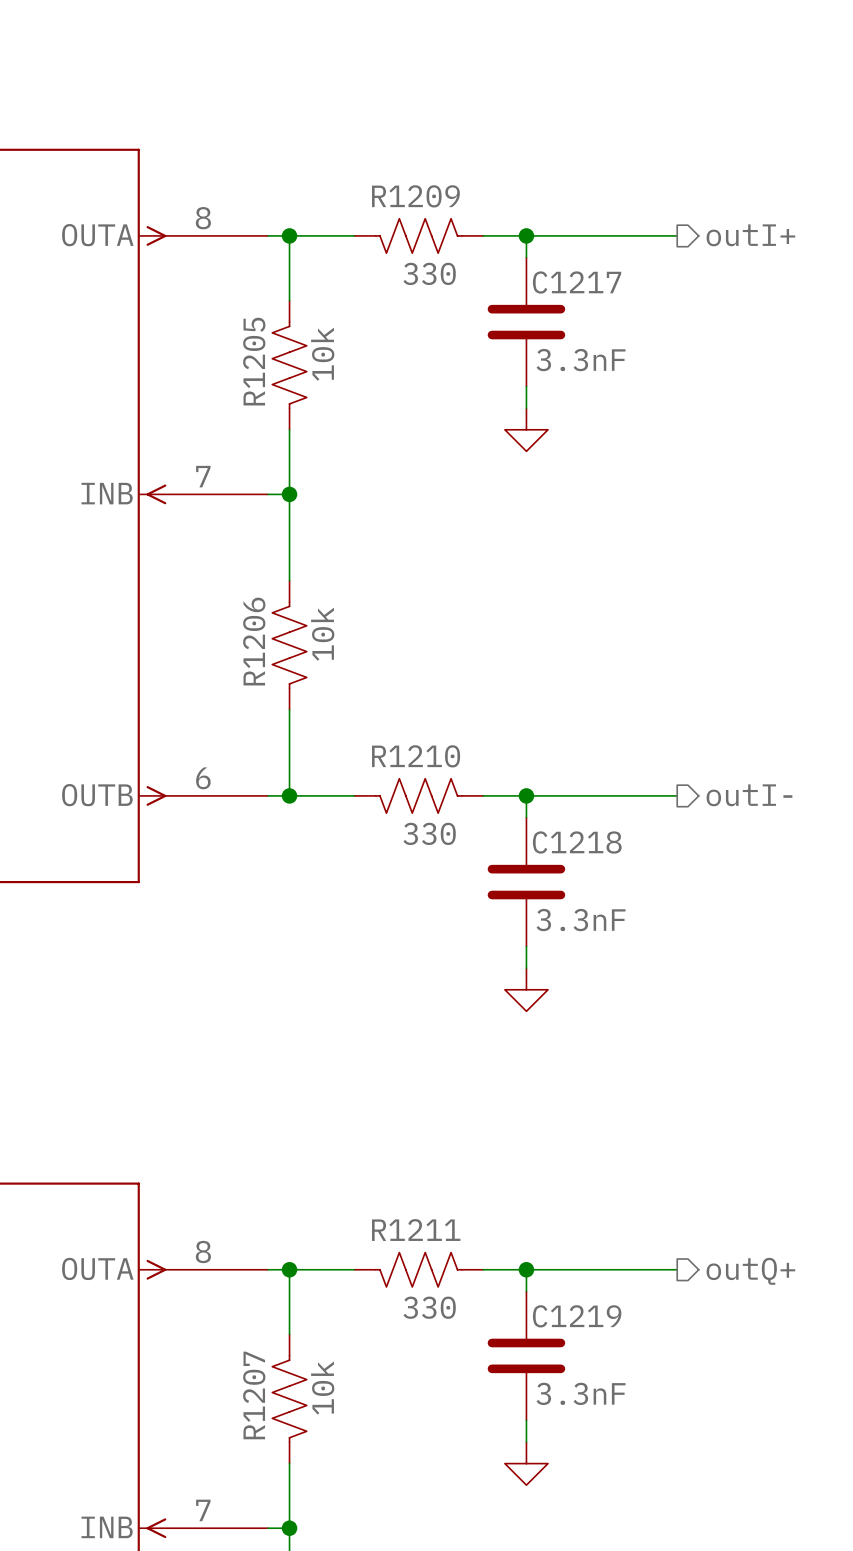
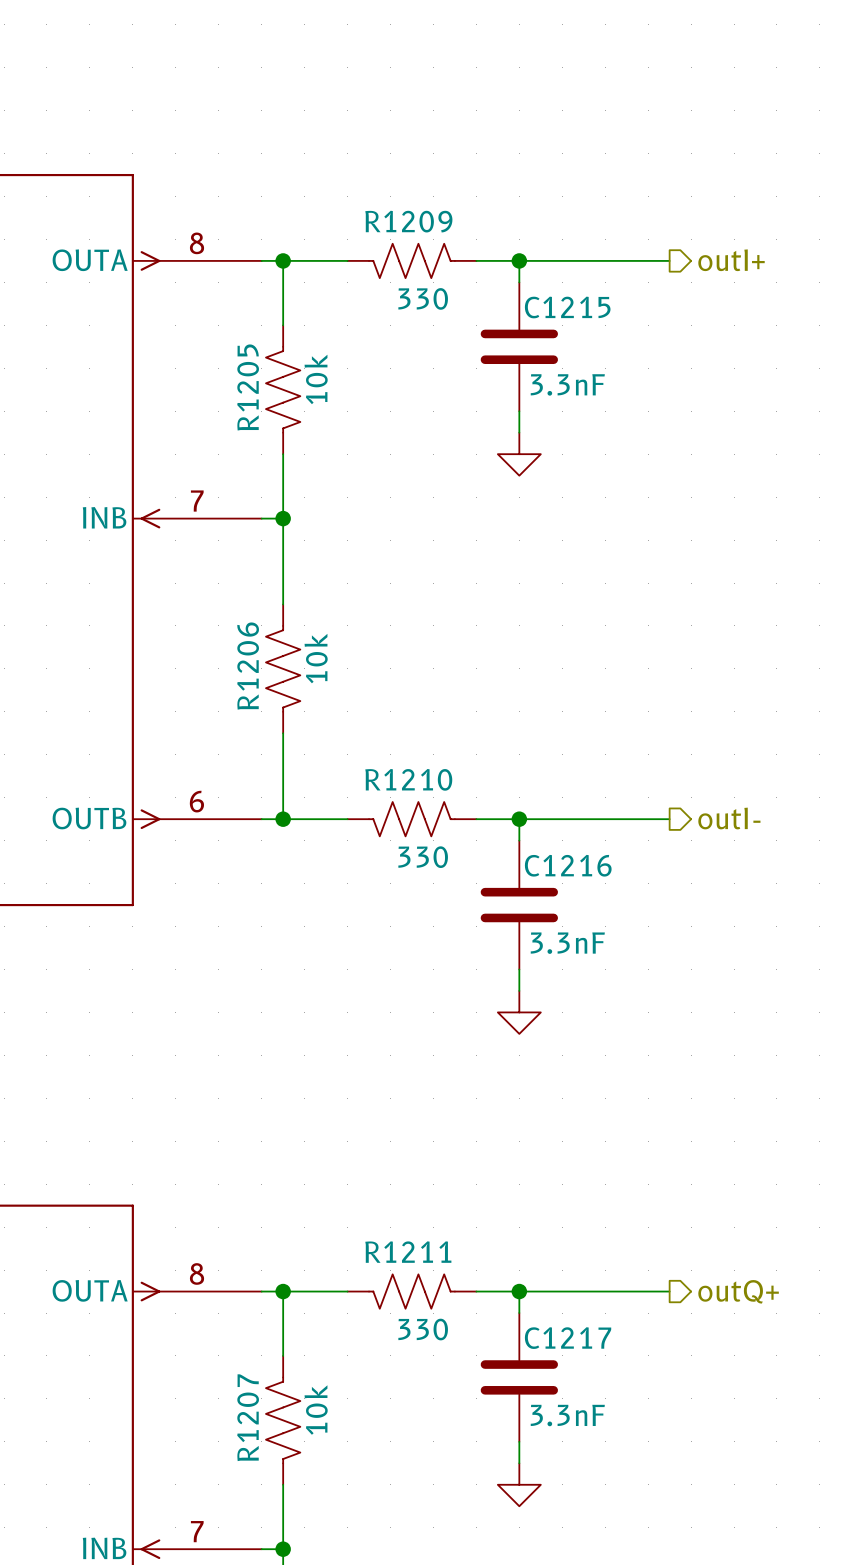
C1217 name: C1217 (577, 282) -> C1215 (567, 307)
C1218 name: C1218 (577, 842) -> C1216 (568, 865)
C1219 name: C1219 (577, 1316) -> C1217 (568, 1338)

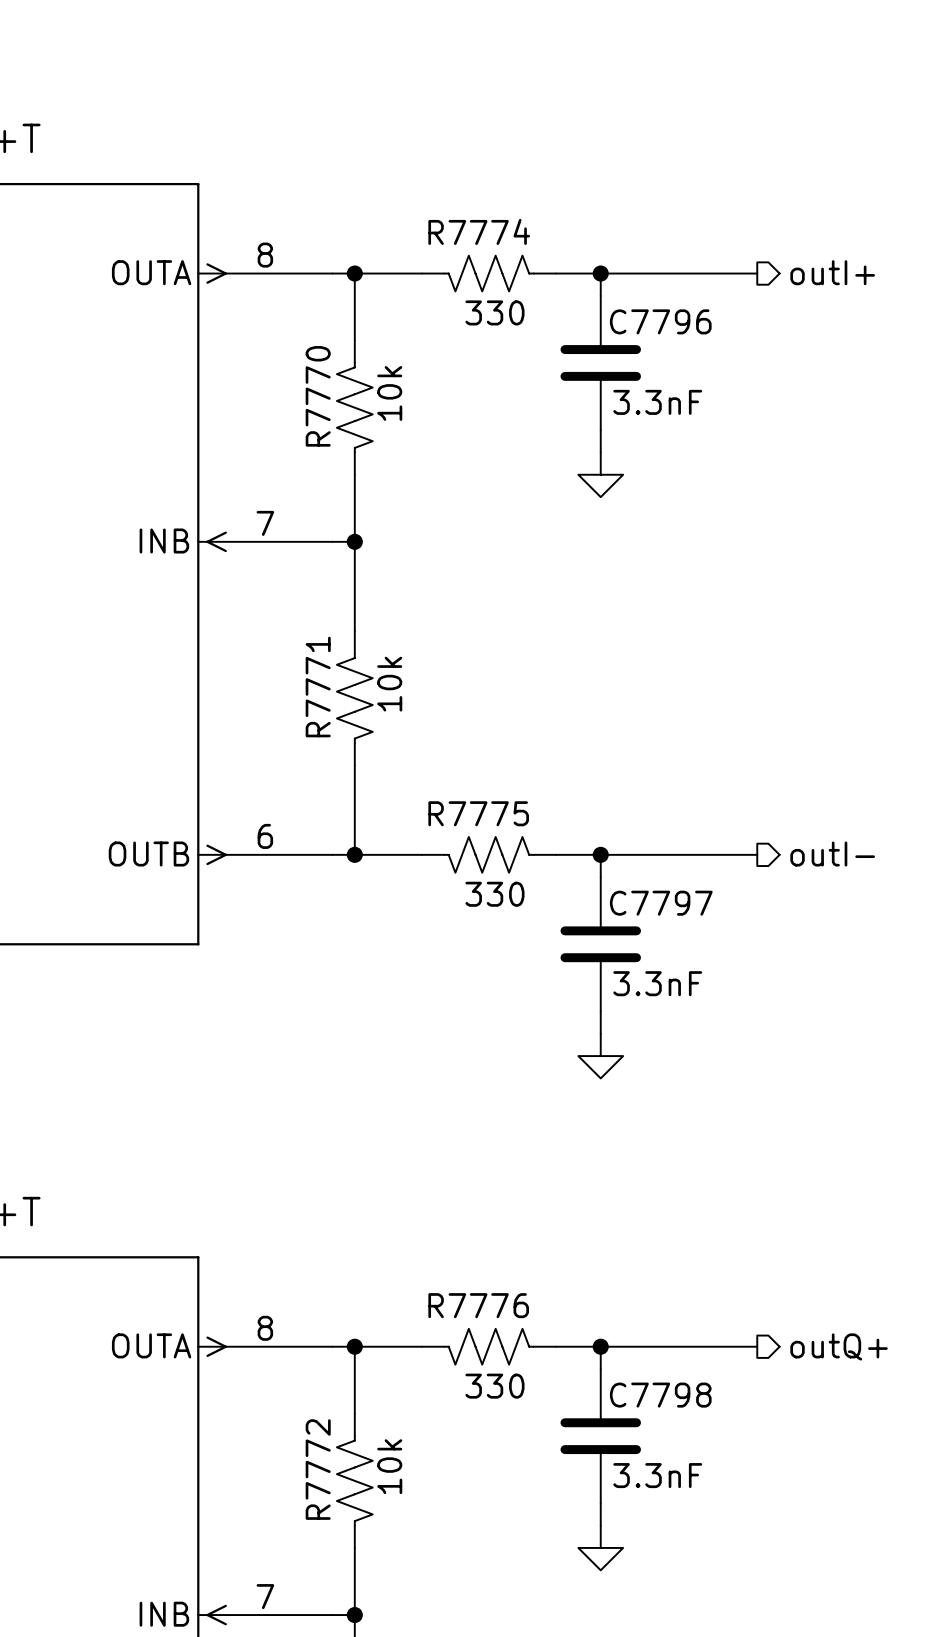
R1209 name: R1209 (408, 221) -> R7774 (479, 231)
C1215 name: C1215 (567, 307) -> C7796 (660, 321)
R1205 name: R1205 (248, 387) -> R7770 (318, 396)
R1206 name: R1206 (248, 666) -> R7771 (318, 686)
R1210 name: R1210 (408, 779) -> R7775 (478, 813)
C1216 name: C1216 (568, 865) -> C7797 (661, 903)
R1211 name: R1211 (408, 1252) -> R7776 (478, 1305)
C1217 name: C1217 (568, 1338) -> C7798 (660, 1395)
R1207 name: R1207 (248, 1417) -> R7772 (318, 1469)

